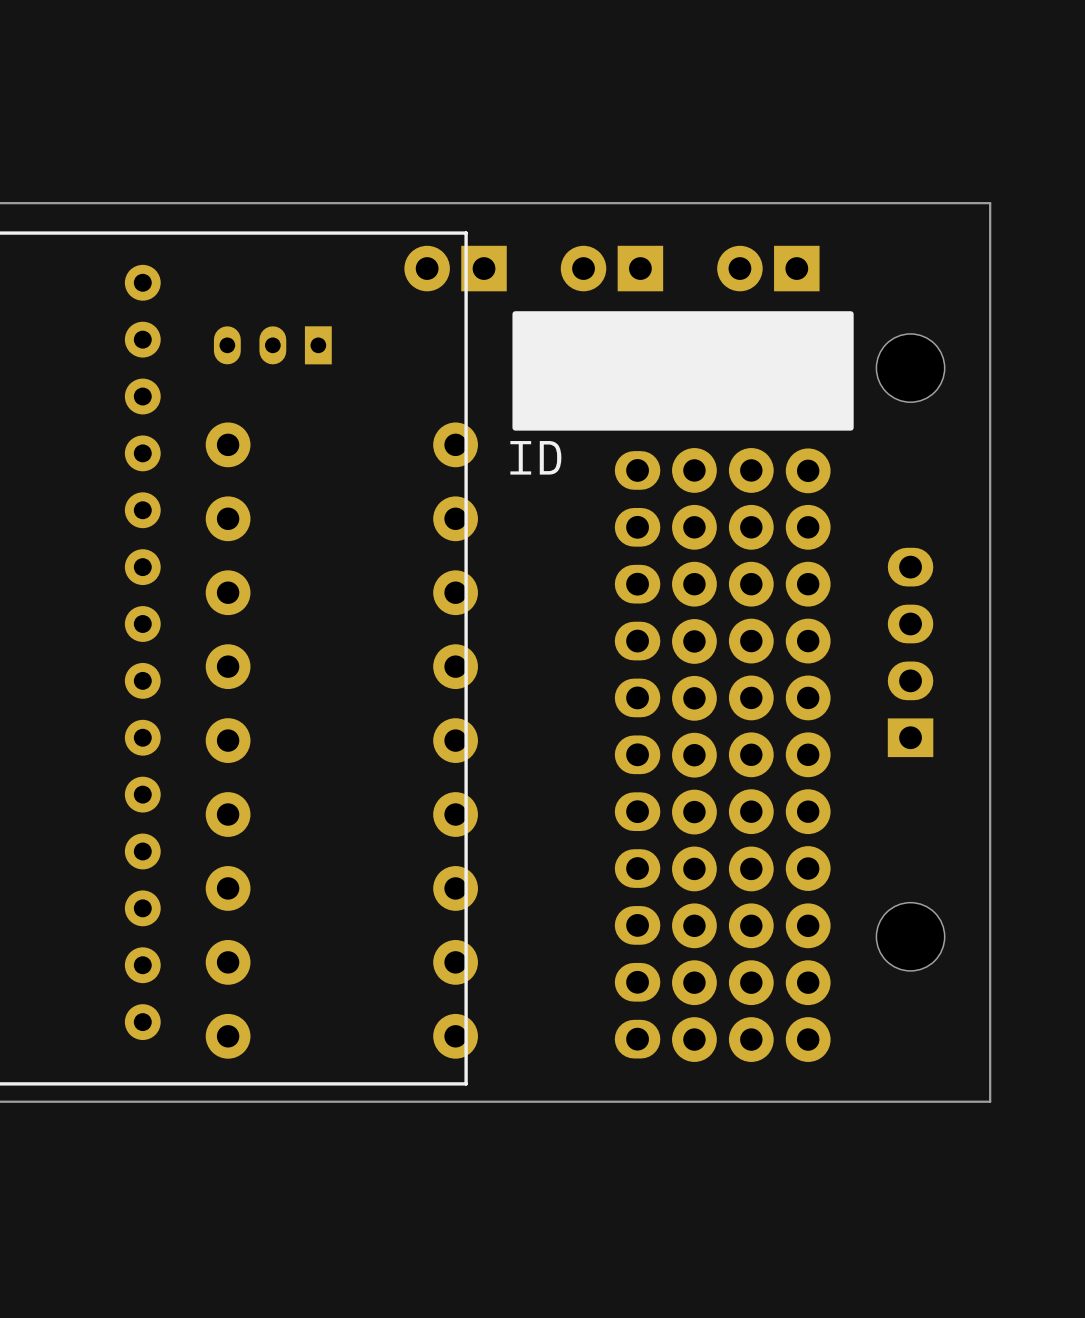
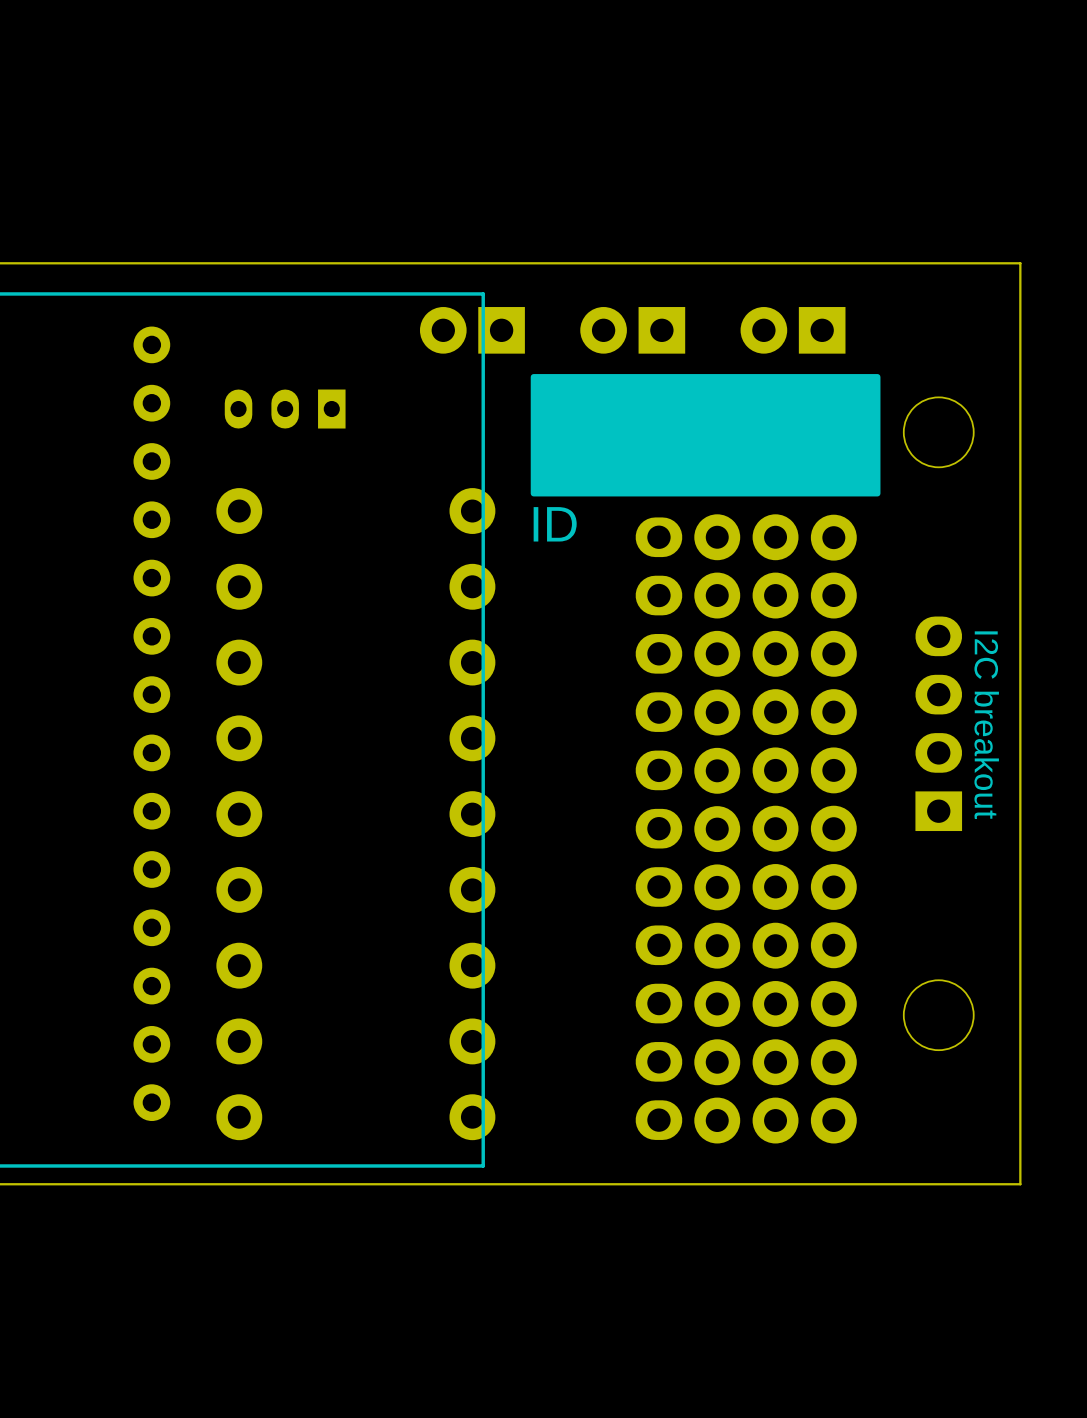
part text: none -> I2C breakout (986, 725)

